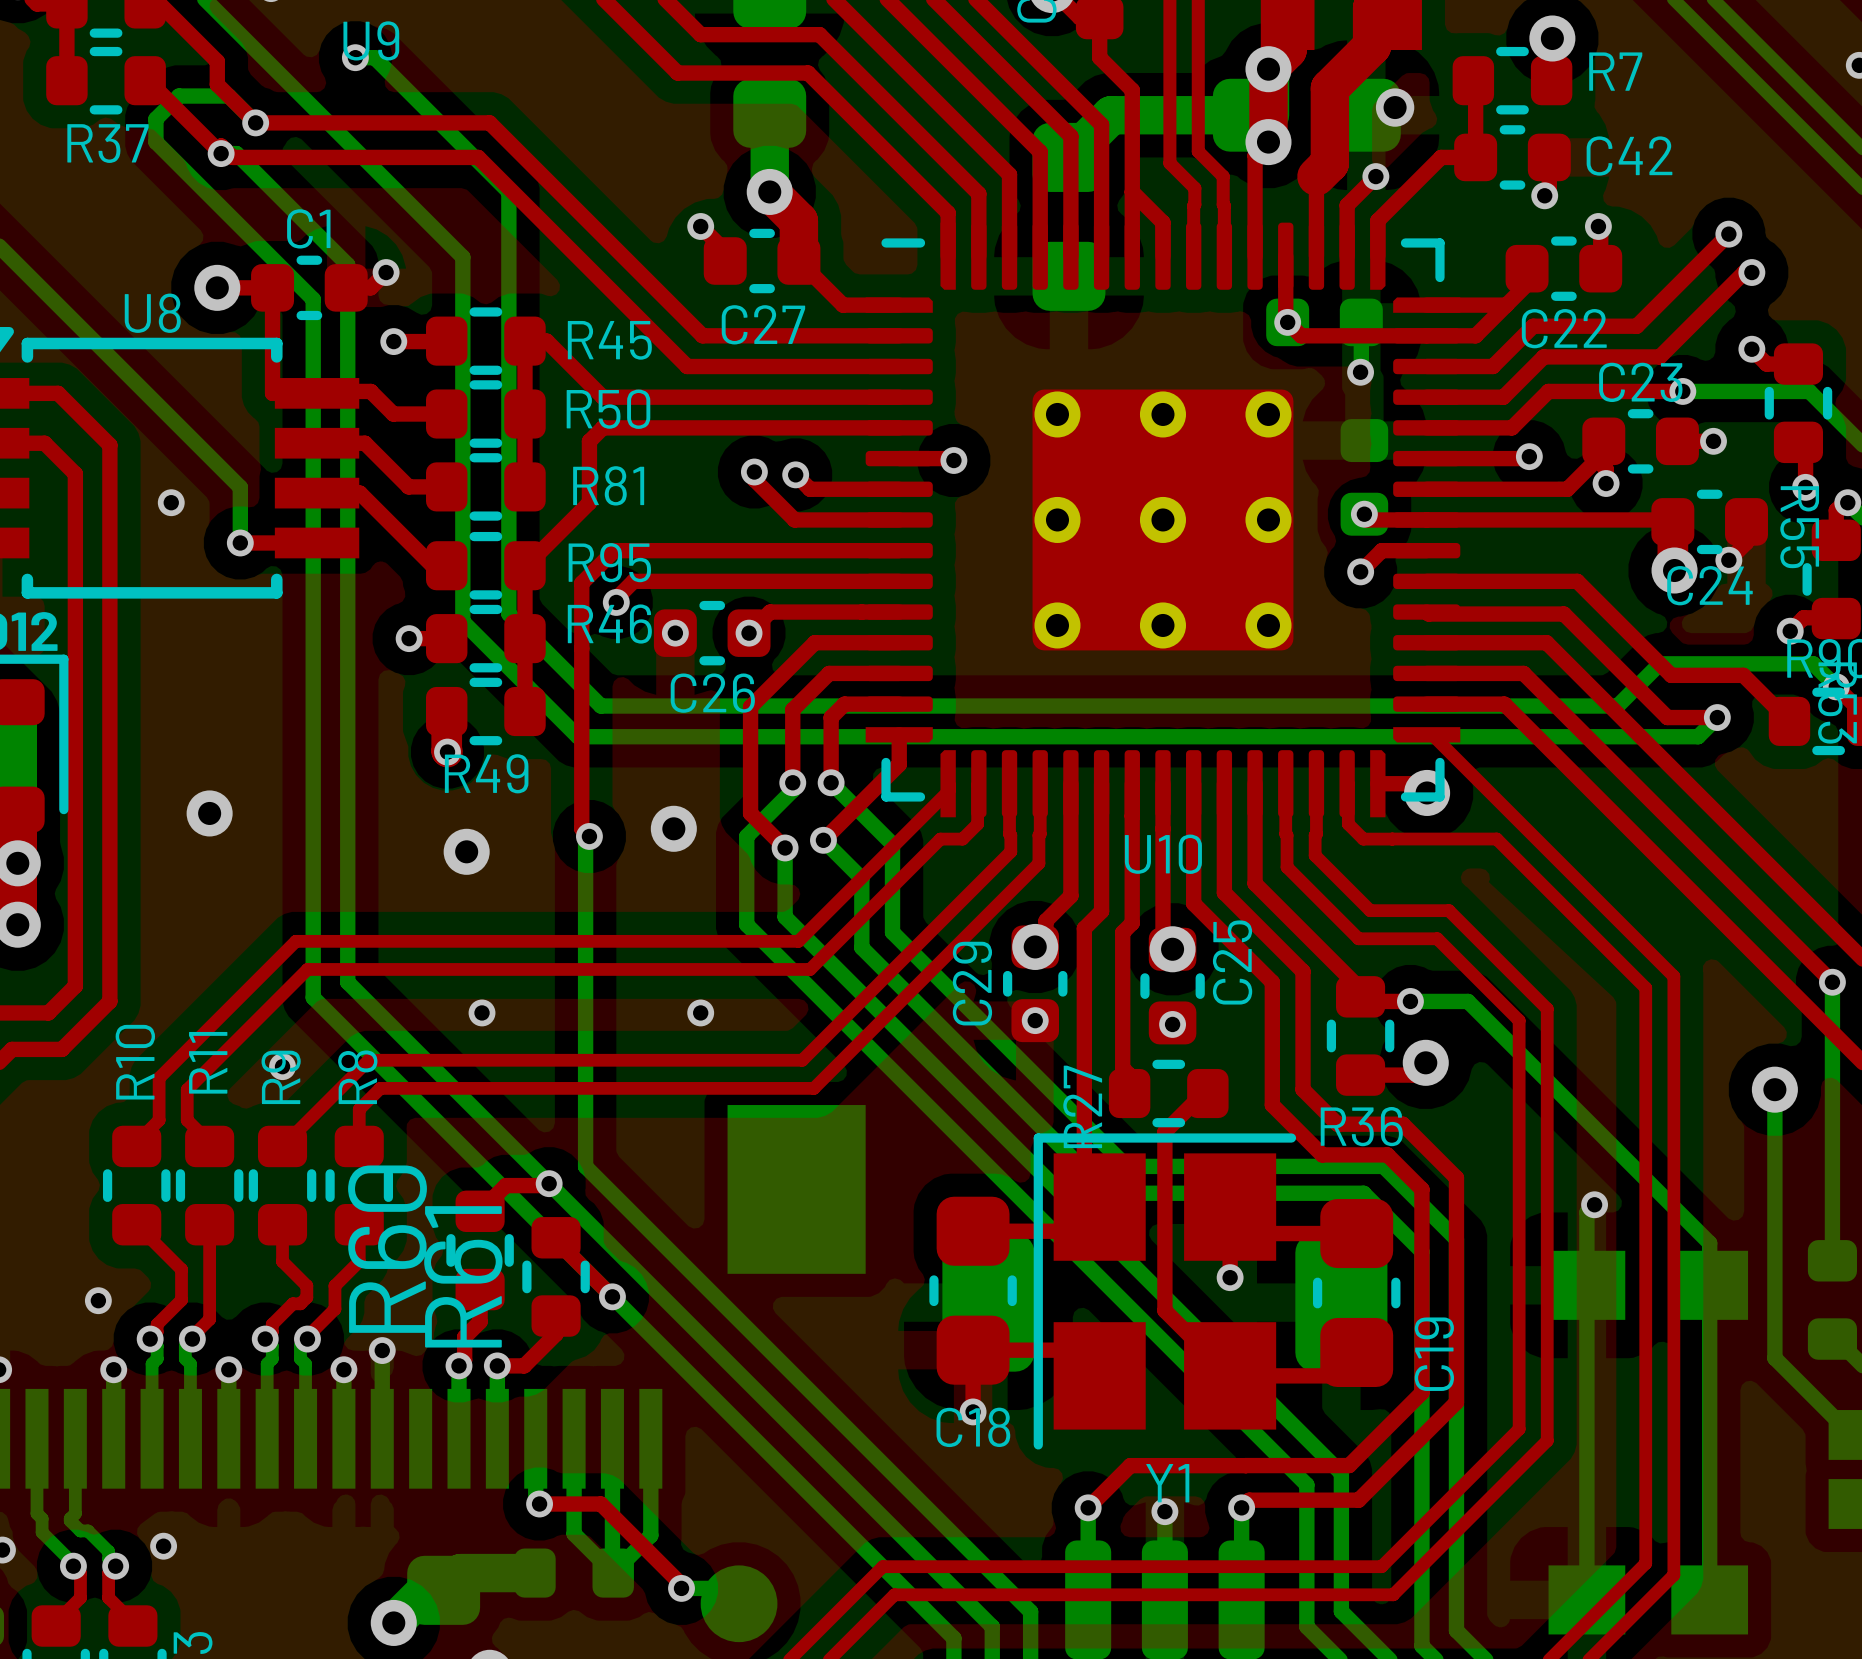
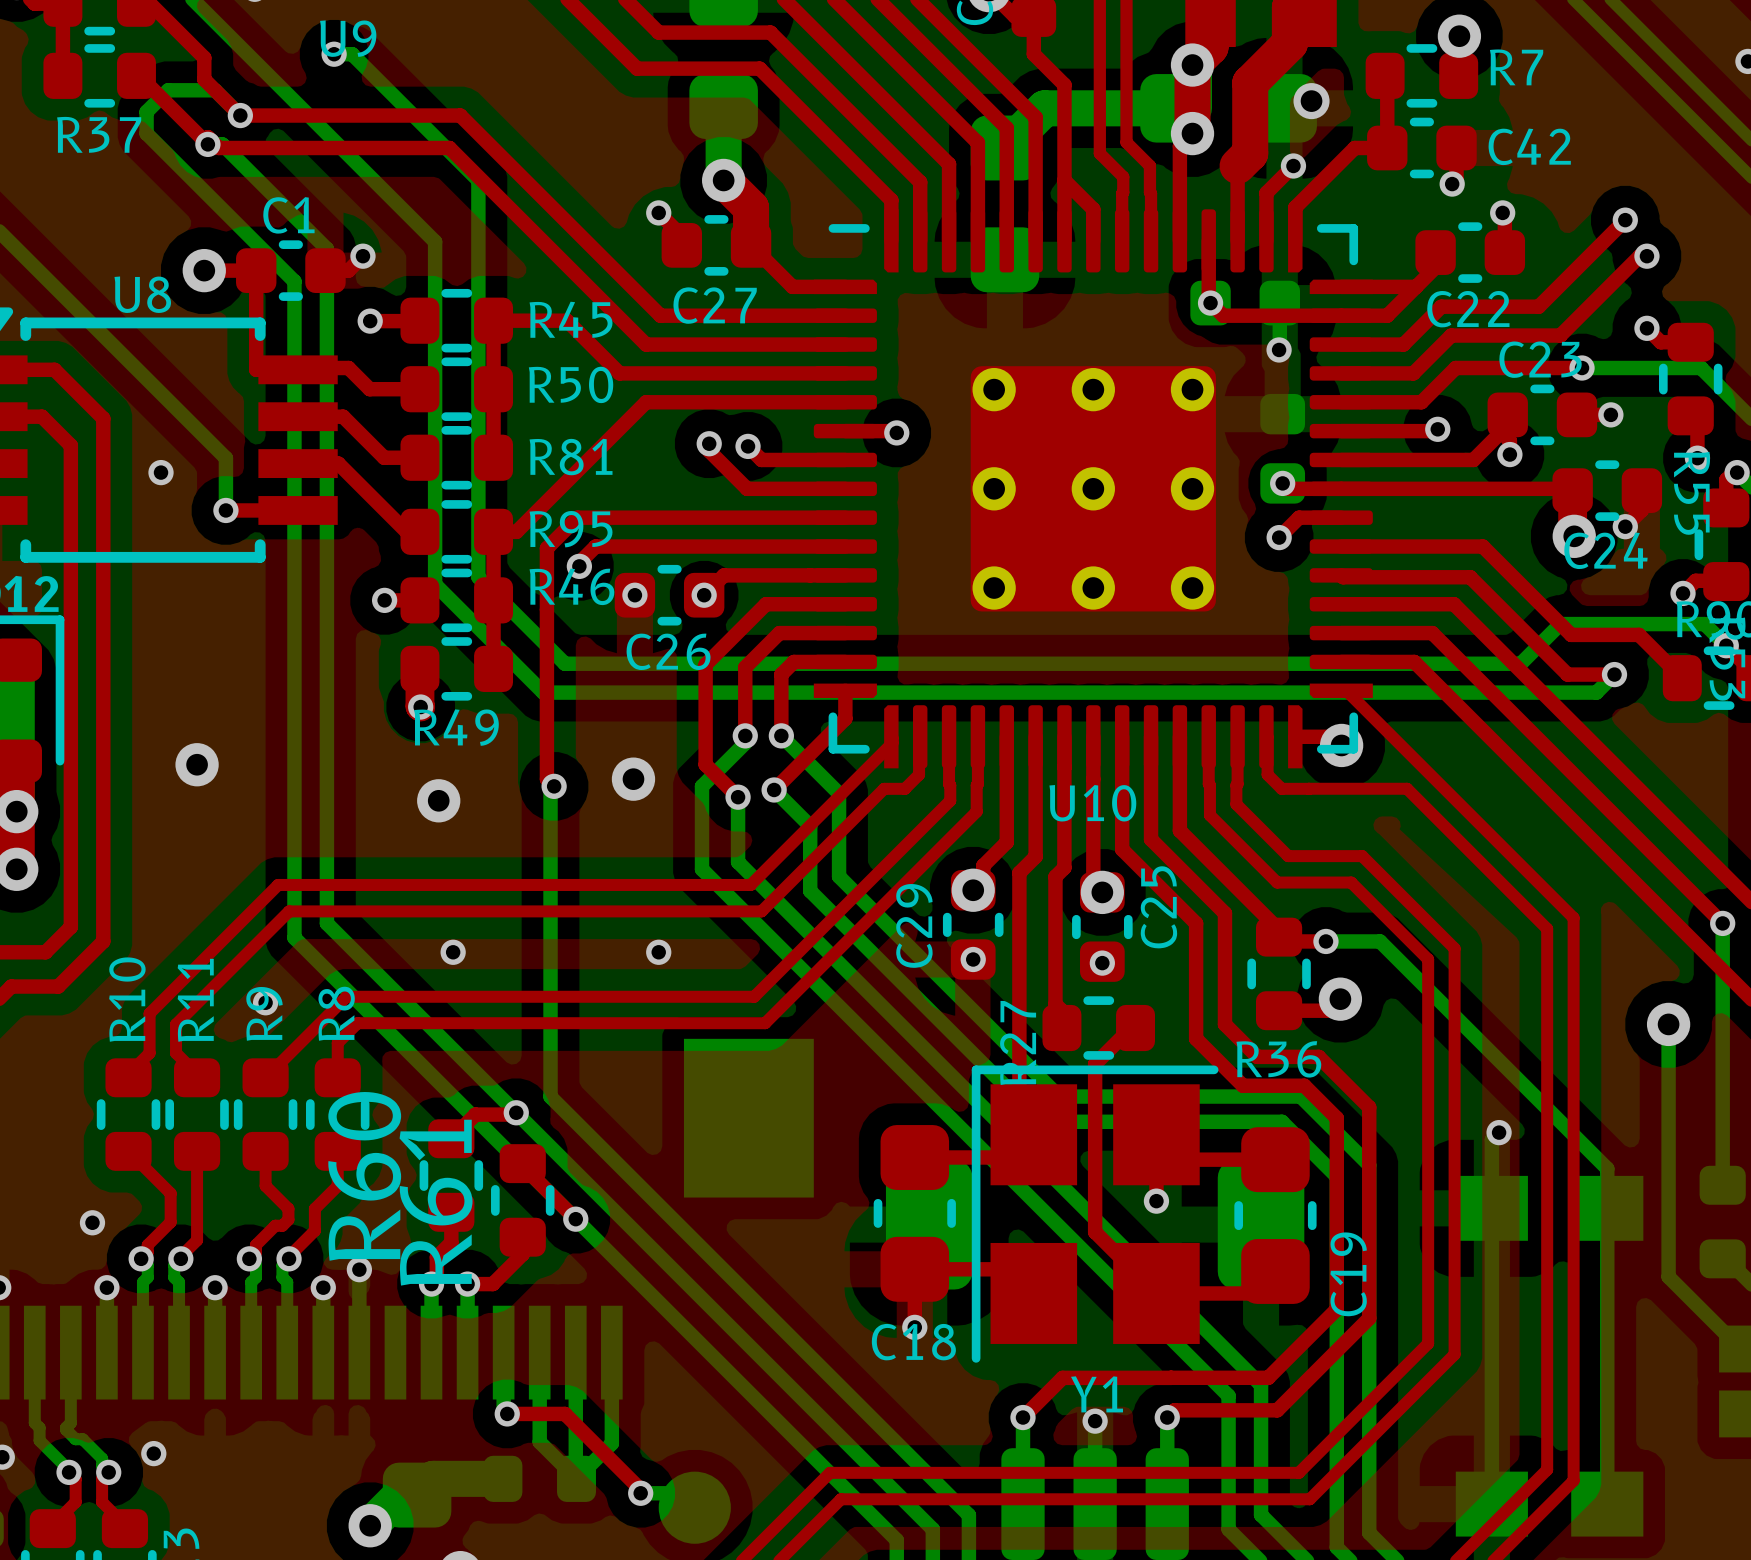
top track: (546, 341) (602, 397) (659, 397) -> (514, 320) (566, 320) (619, 373)
top track: (687, 427) (602, 427) (589, 441) (589, 502) (526, 565) -> (646, 402) (516, 531) (494, 531)

